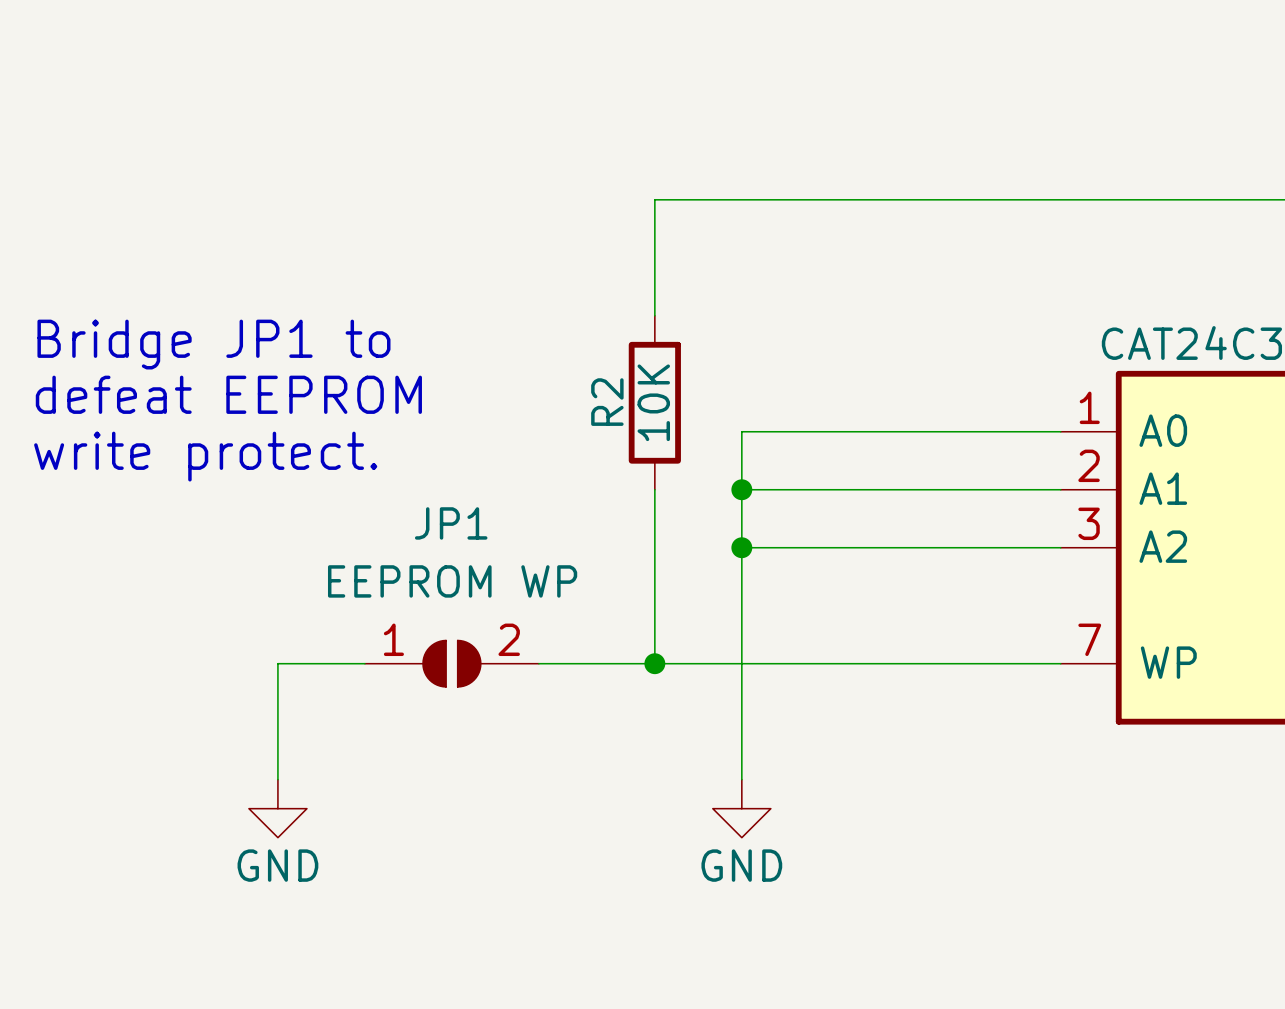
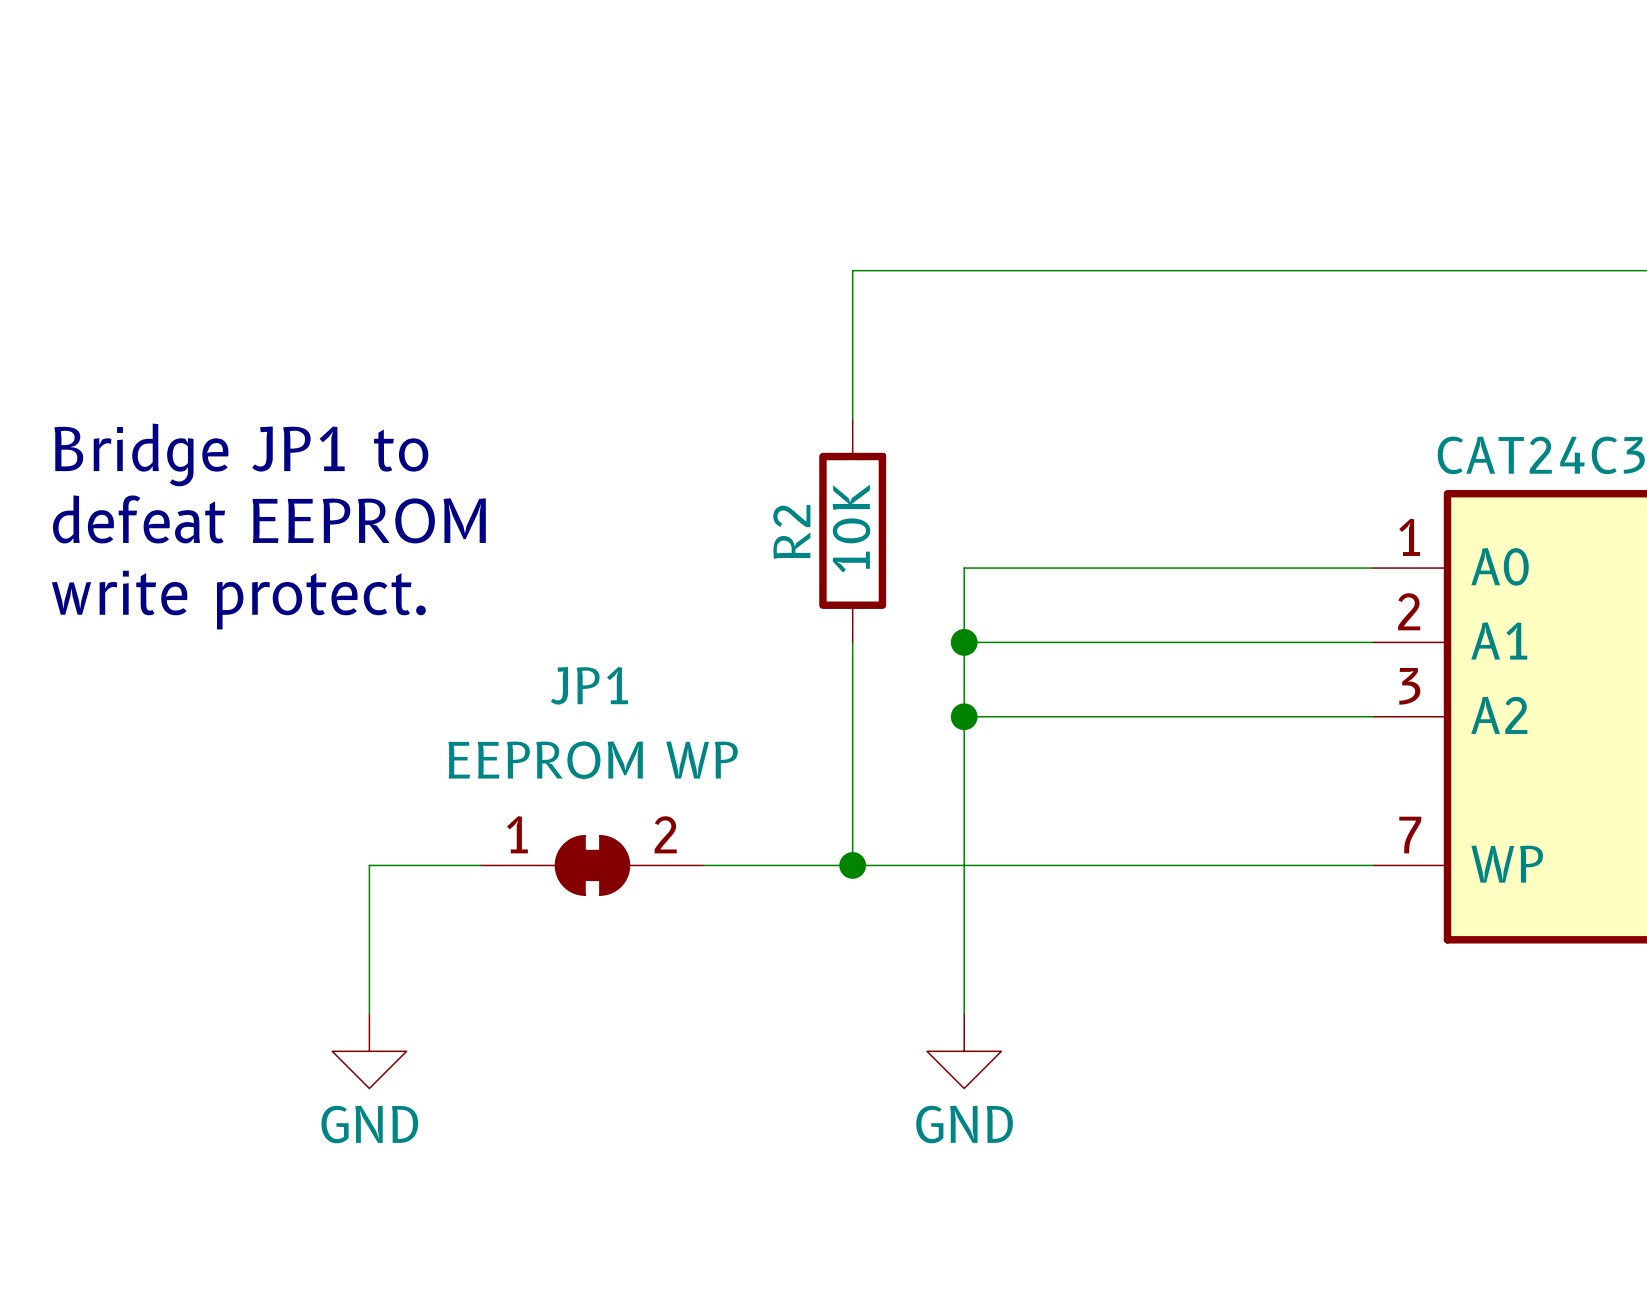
JP1 symbol: [364, 640, 539, 687] -> [480, 835, 704, 896]

